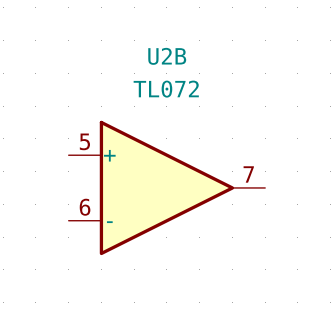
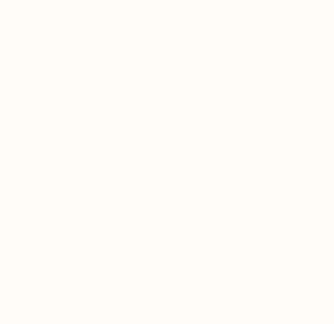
U2B: TL072 (166, 187) -> none

